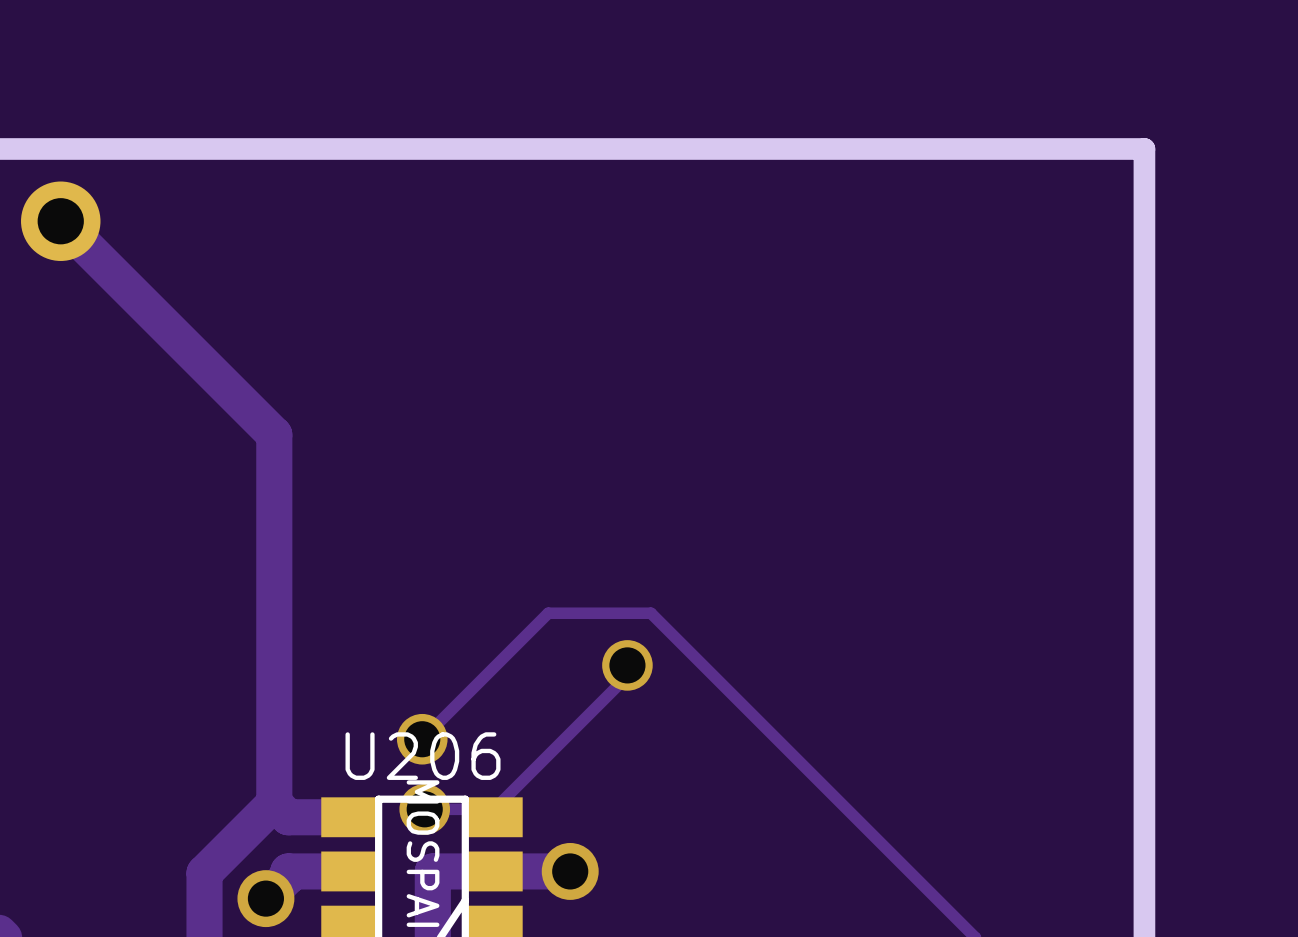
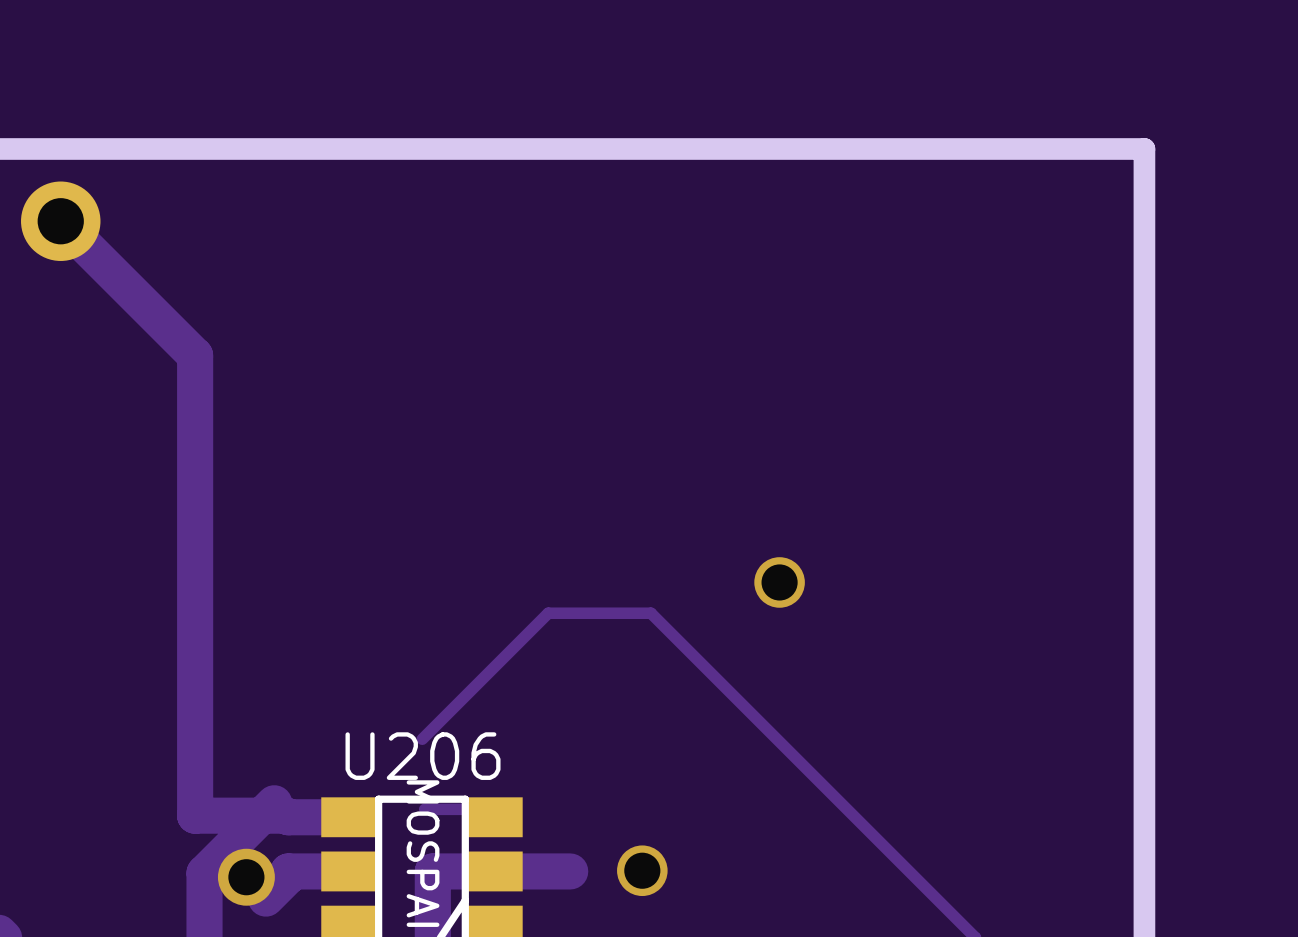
track: (195, 355) (274, 434) (274, 803) (286, 815) -> (195, 355) (195, 815) (286, 815)
via: none -> (779, 582)
track: (627, 665) (627, 676) (494, 809) -> none
via: (627, 665) -> none
via: (422, 739) -> none
via: (424, 809) -> none
via: none -> (642, 870)
via: (570, 871) -> none
via position: (265, 898) -> (246, 877)

